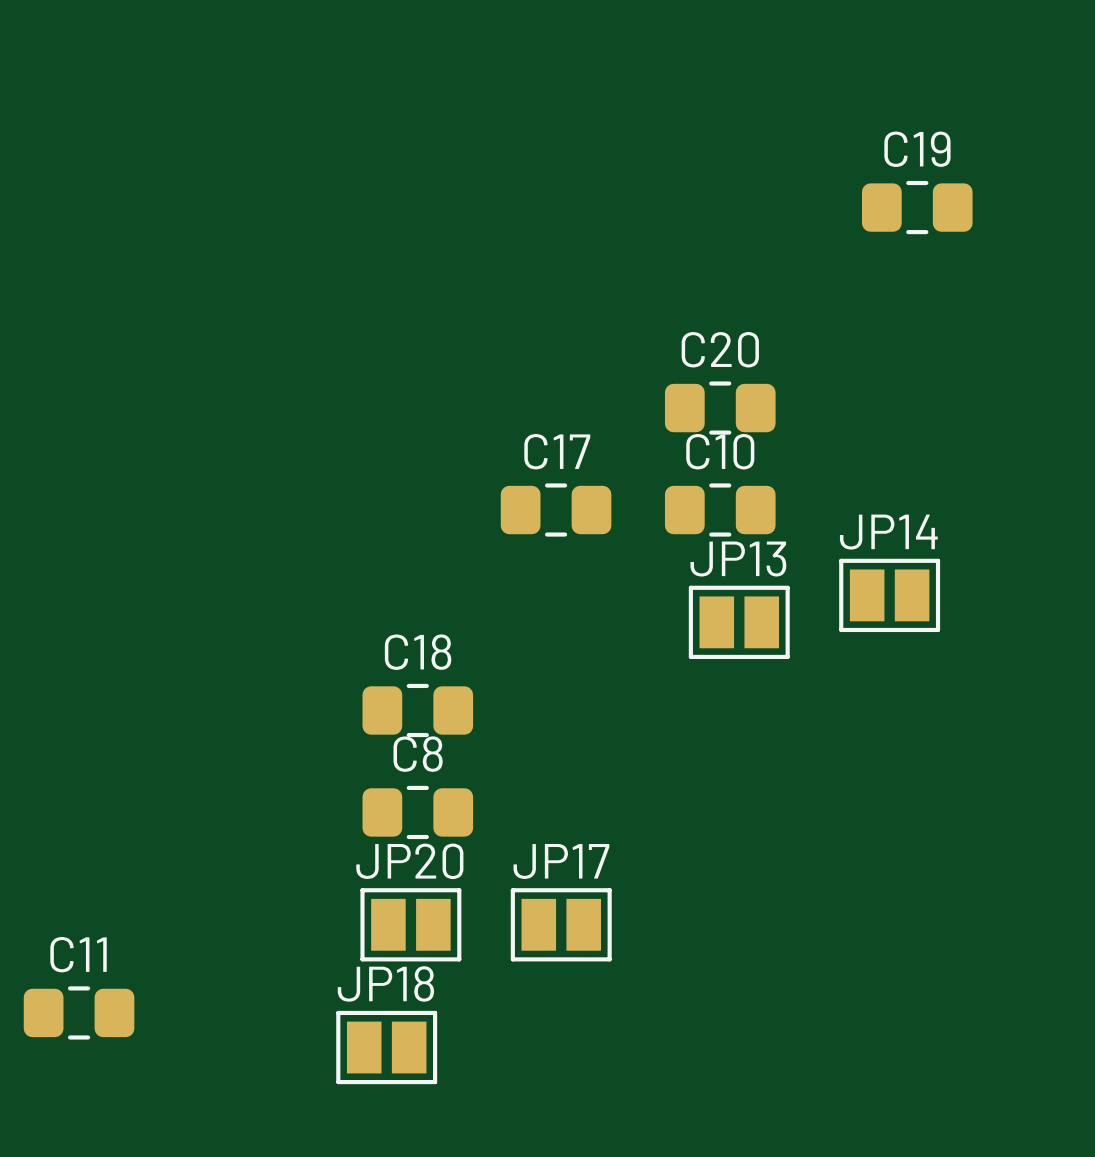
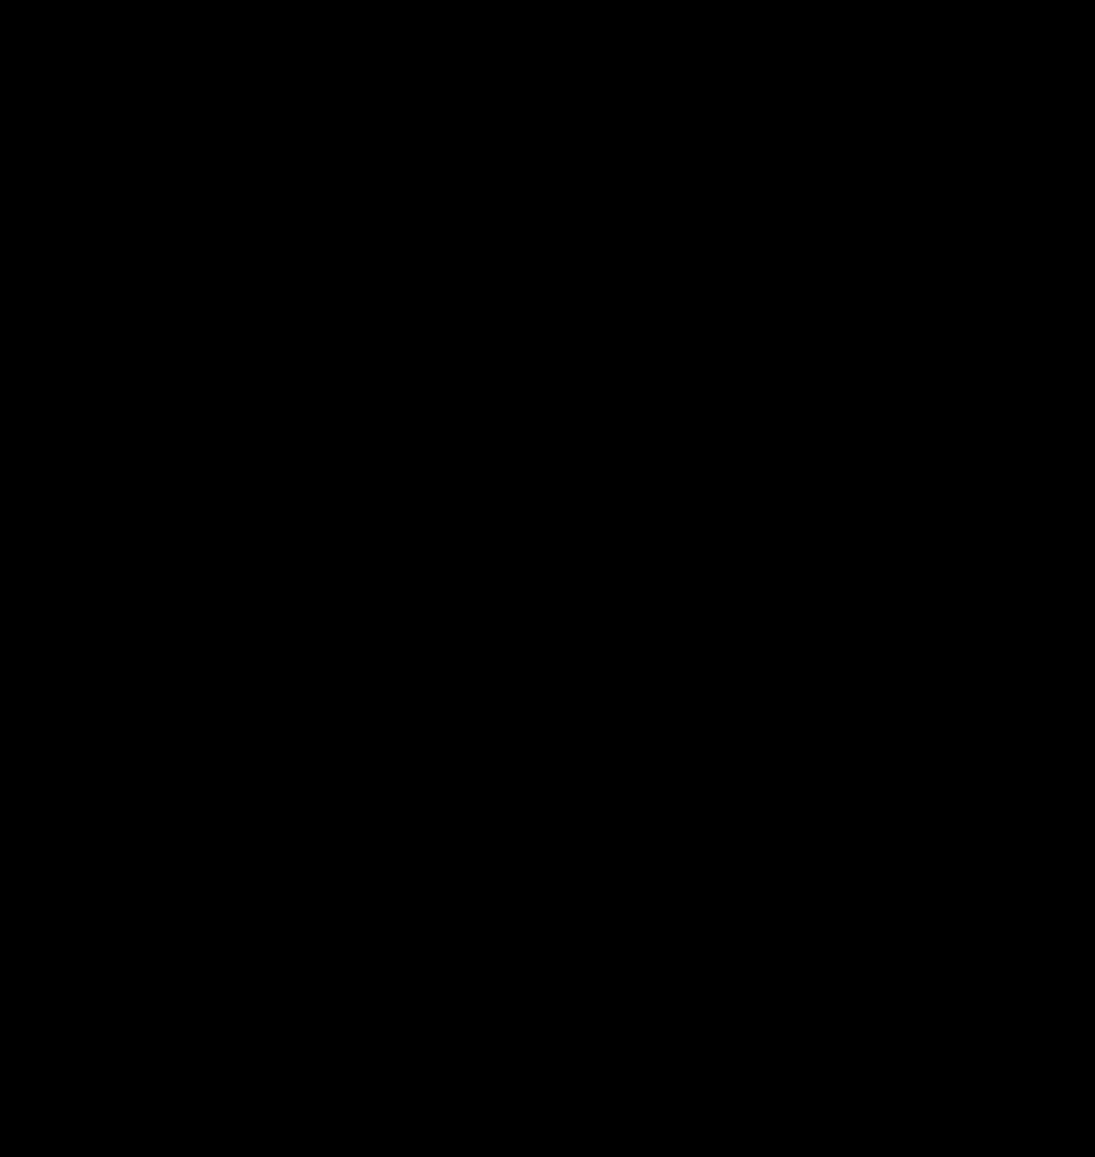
C19: (917, 207) -> none
C20: (720, 408) -> none
C17: (556, 510) -> none
C10: (720, 510) -> none
JP14: (889, 595) -> none
JP13: (739, 622) -> none
C18: (417, 710) -> none
C8: (417, 812) -> none
JP20: (410, 924) -> none
JP17: (561, 924) -> none
C11: (79, 1012) -> none
JP18: (386, 1047) -> none

